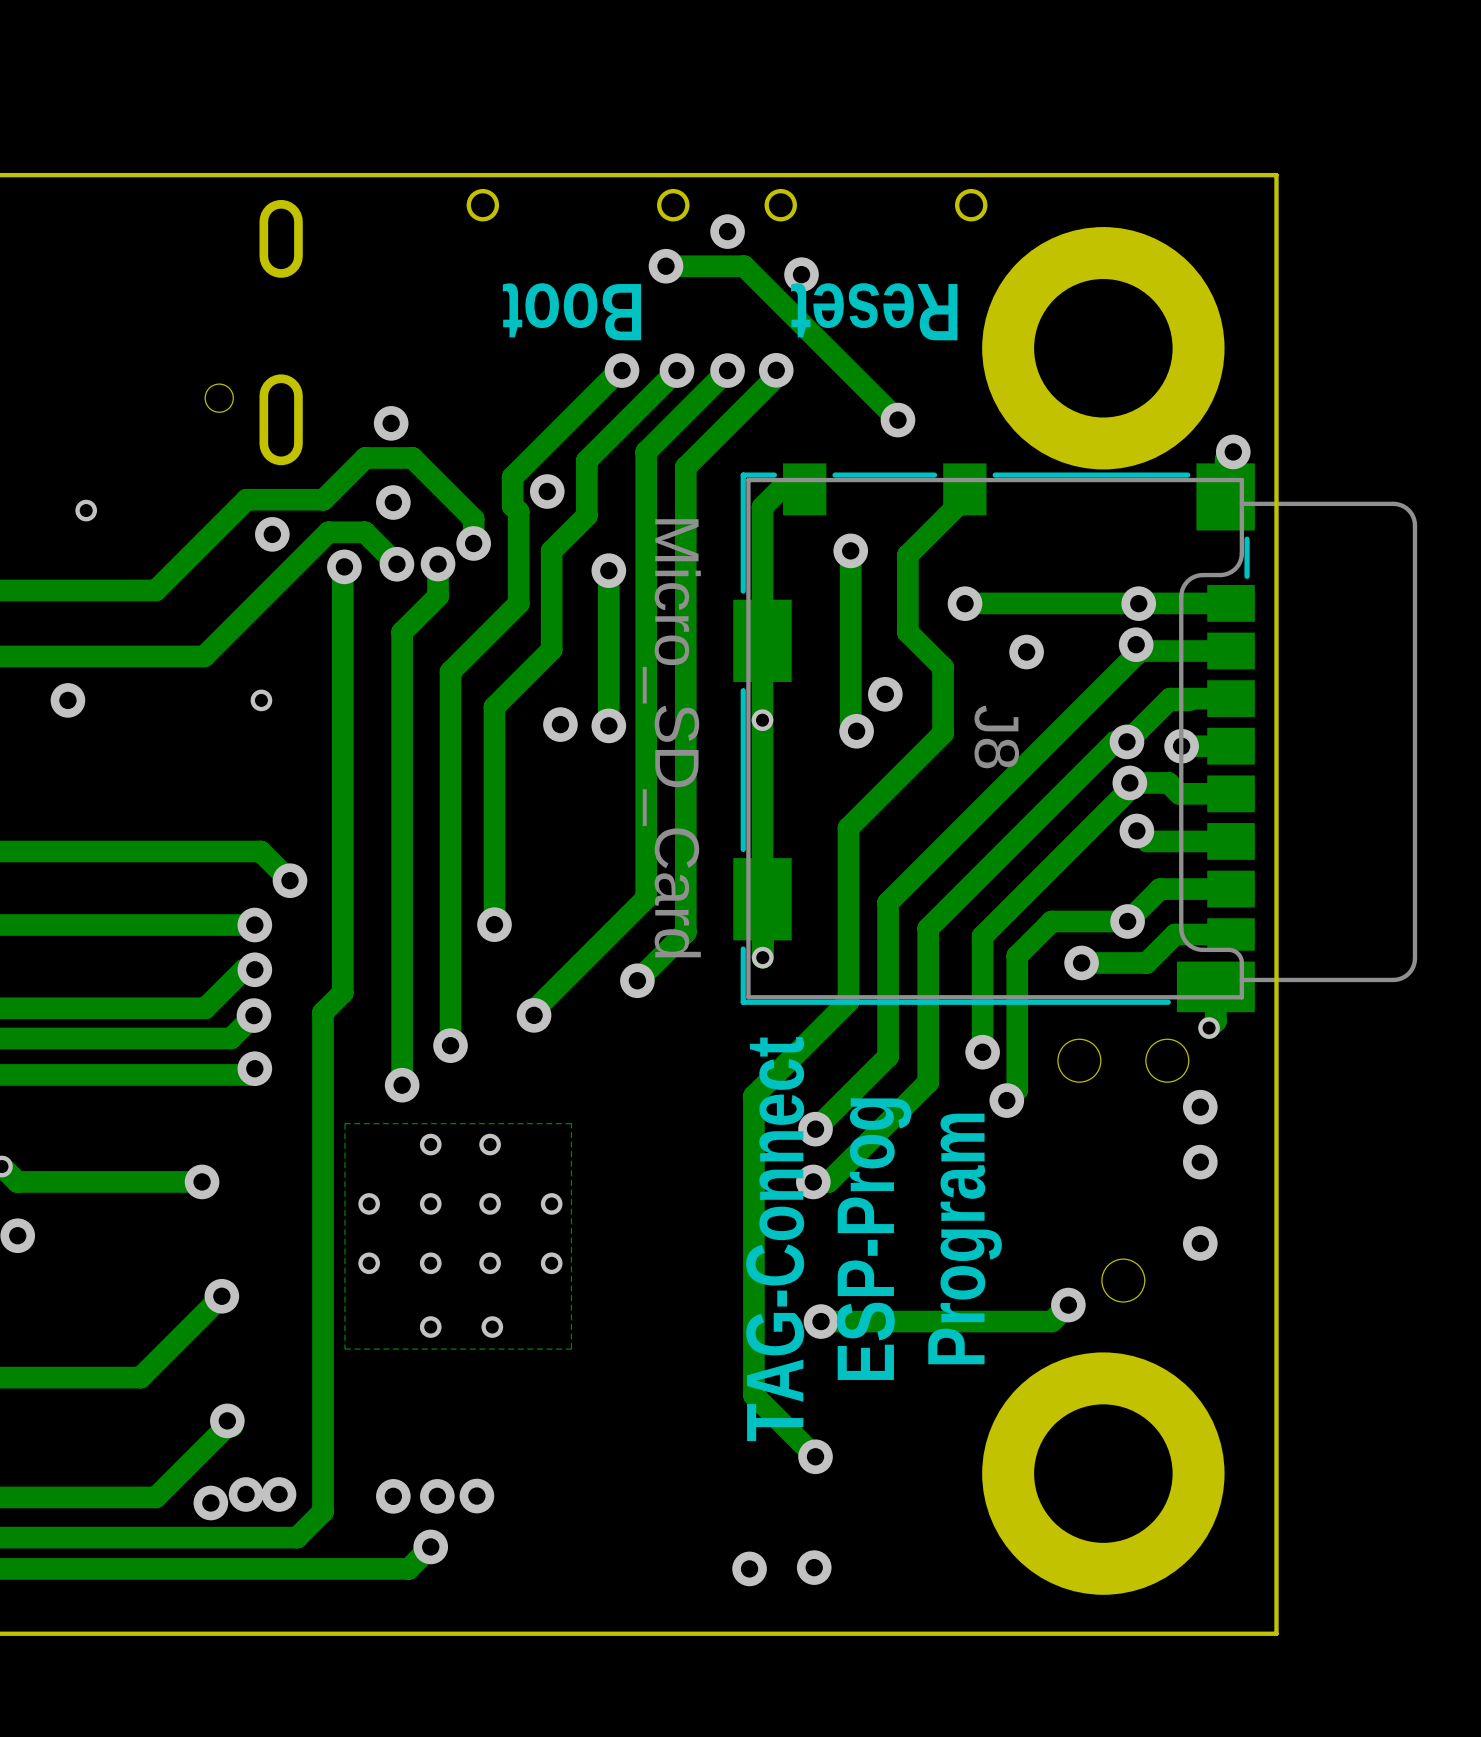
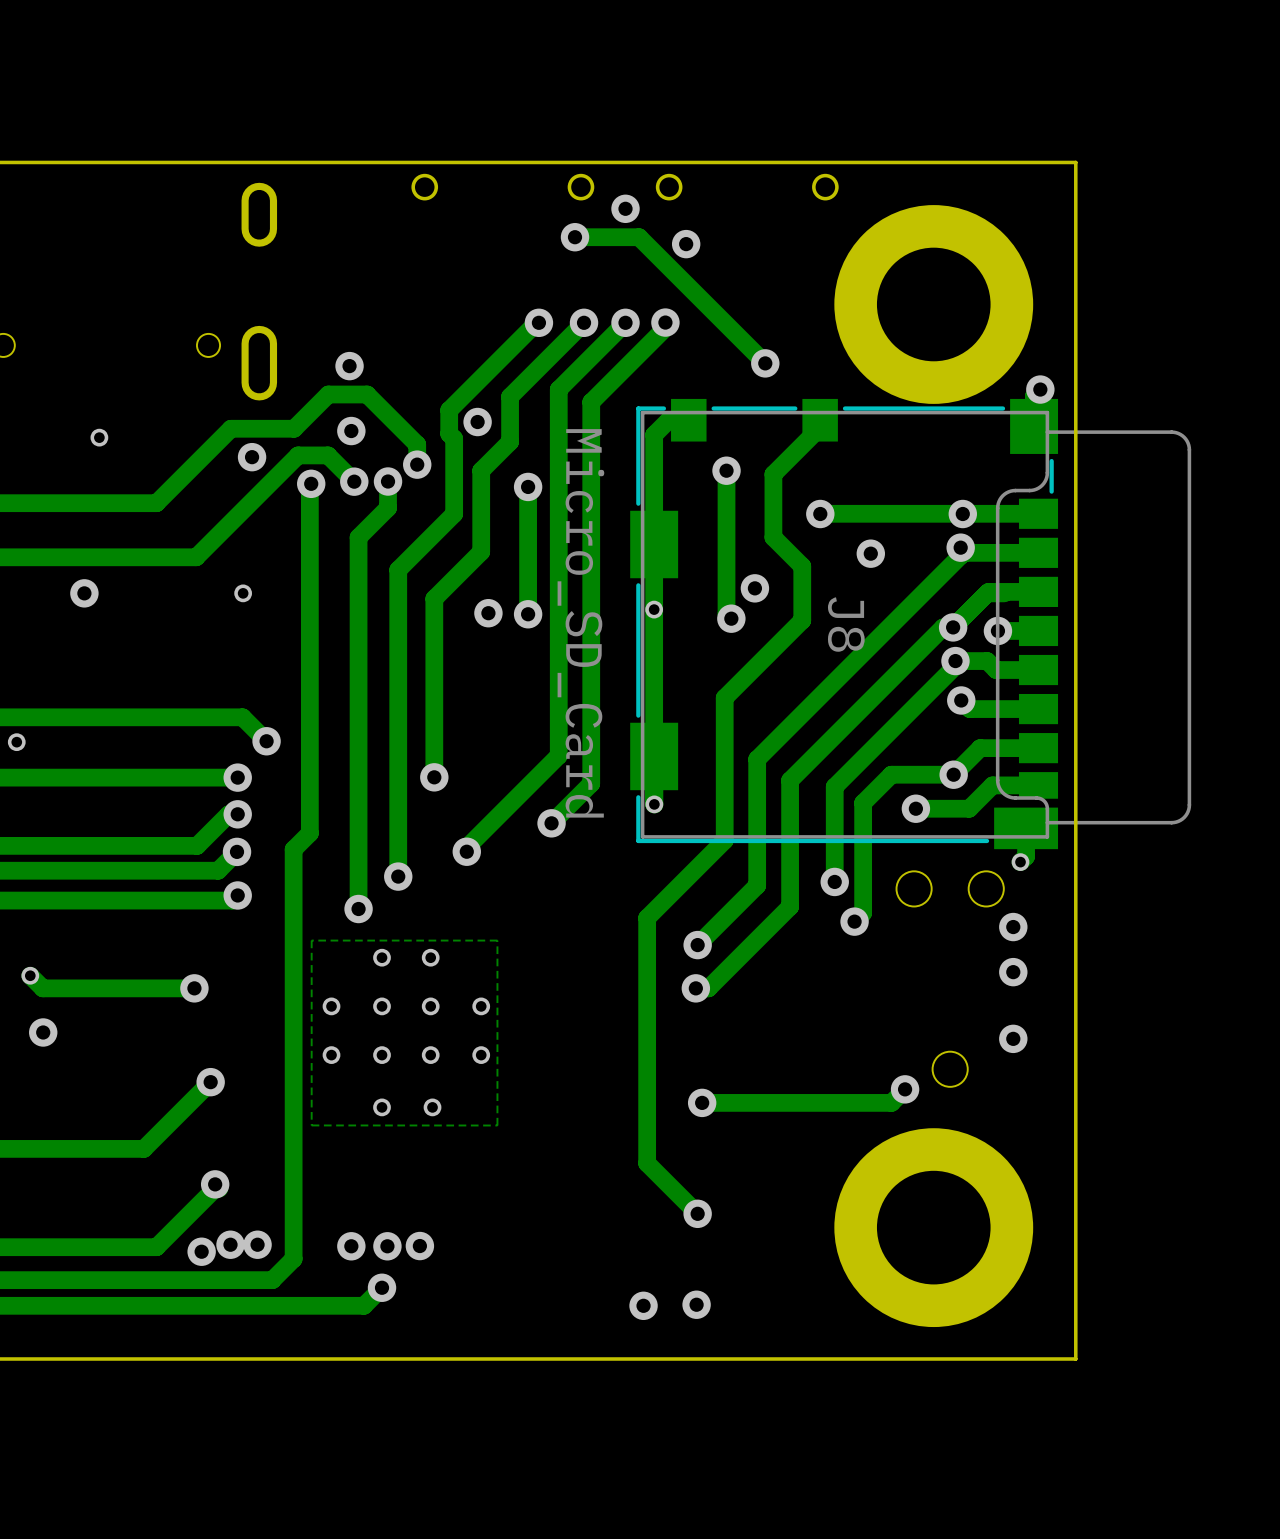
text: Boot (571, 311) -> none
text: Reset (874, 311) -> none
text: Program (965, 1238) -> none
text: TAG-Connect (775, 1239) -> none
text: ESP-Prog (874, 1239) -> none

